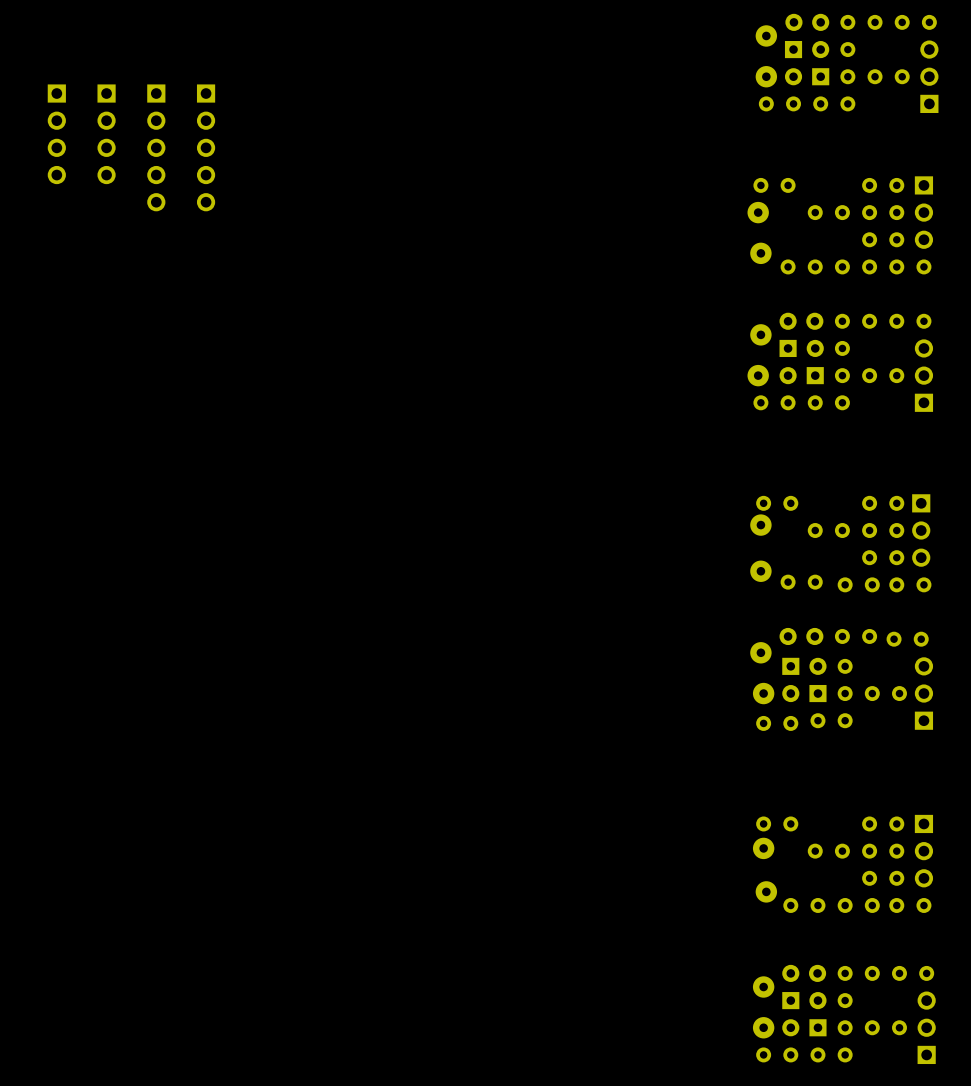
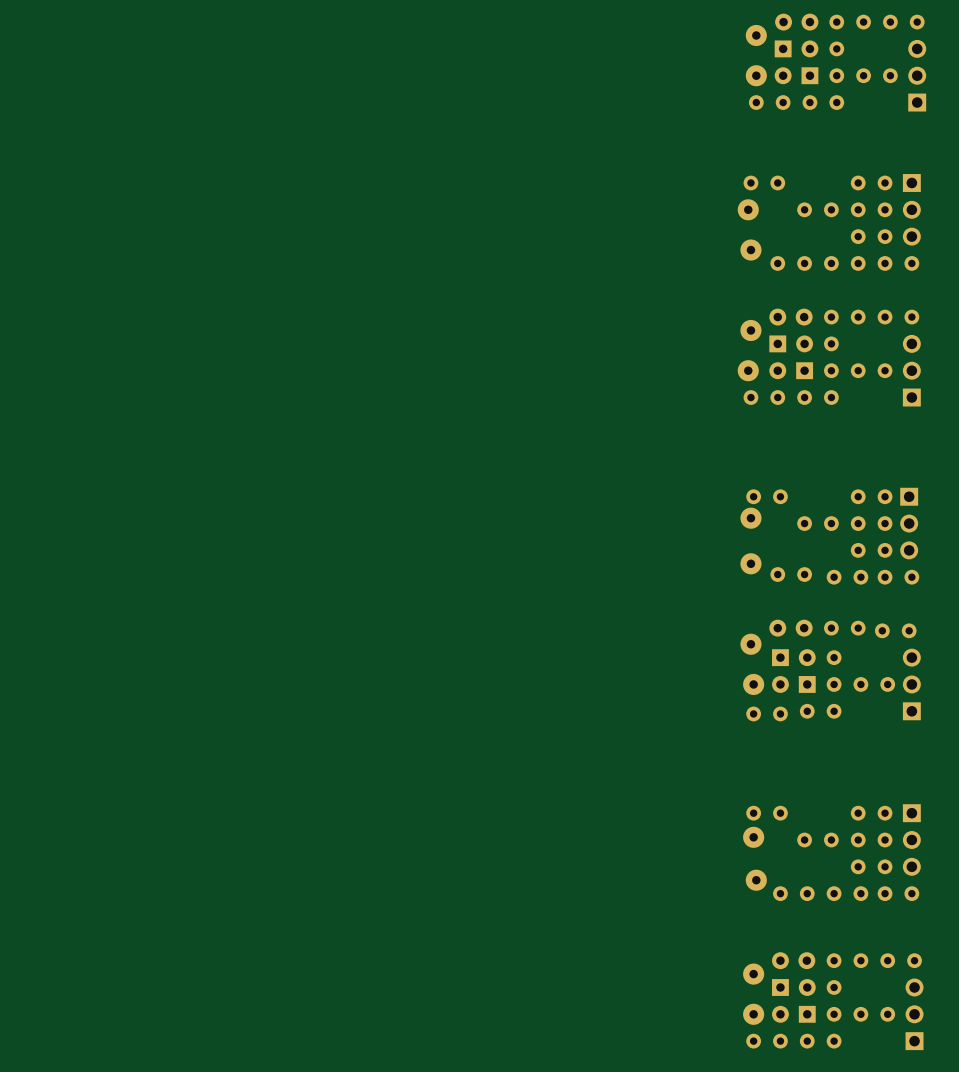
part: (56, 134) -> none
part: (106, 134) -> none
part: (156, 147) -> none
part: (206, 147) -> none

